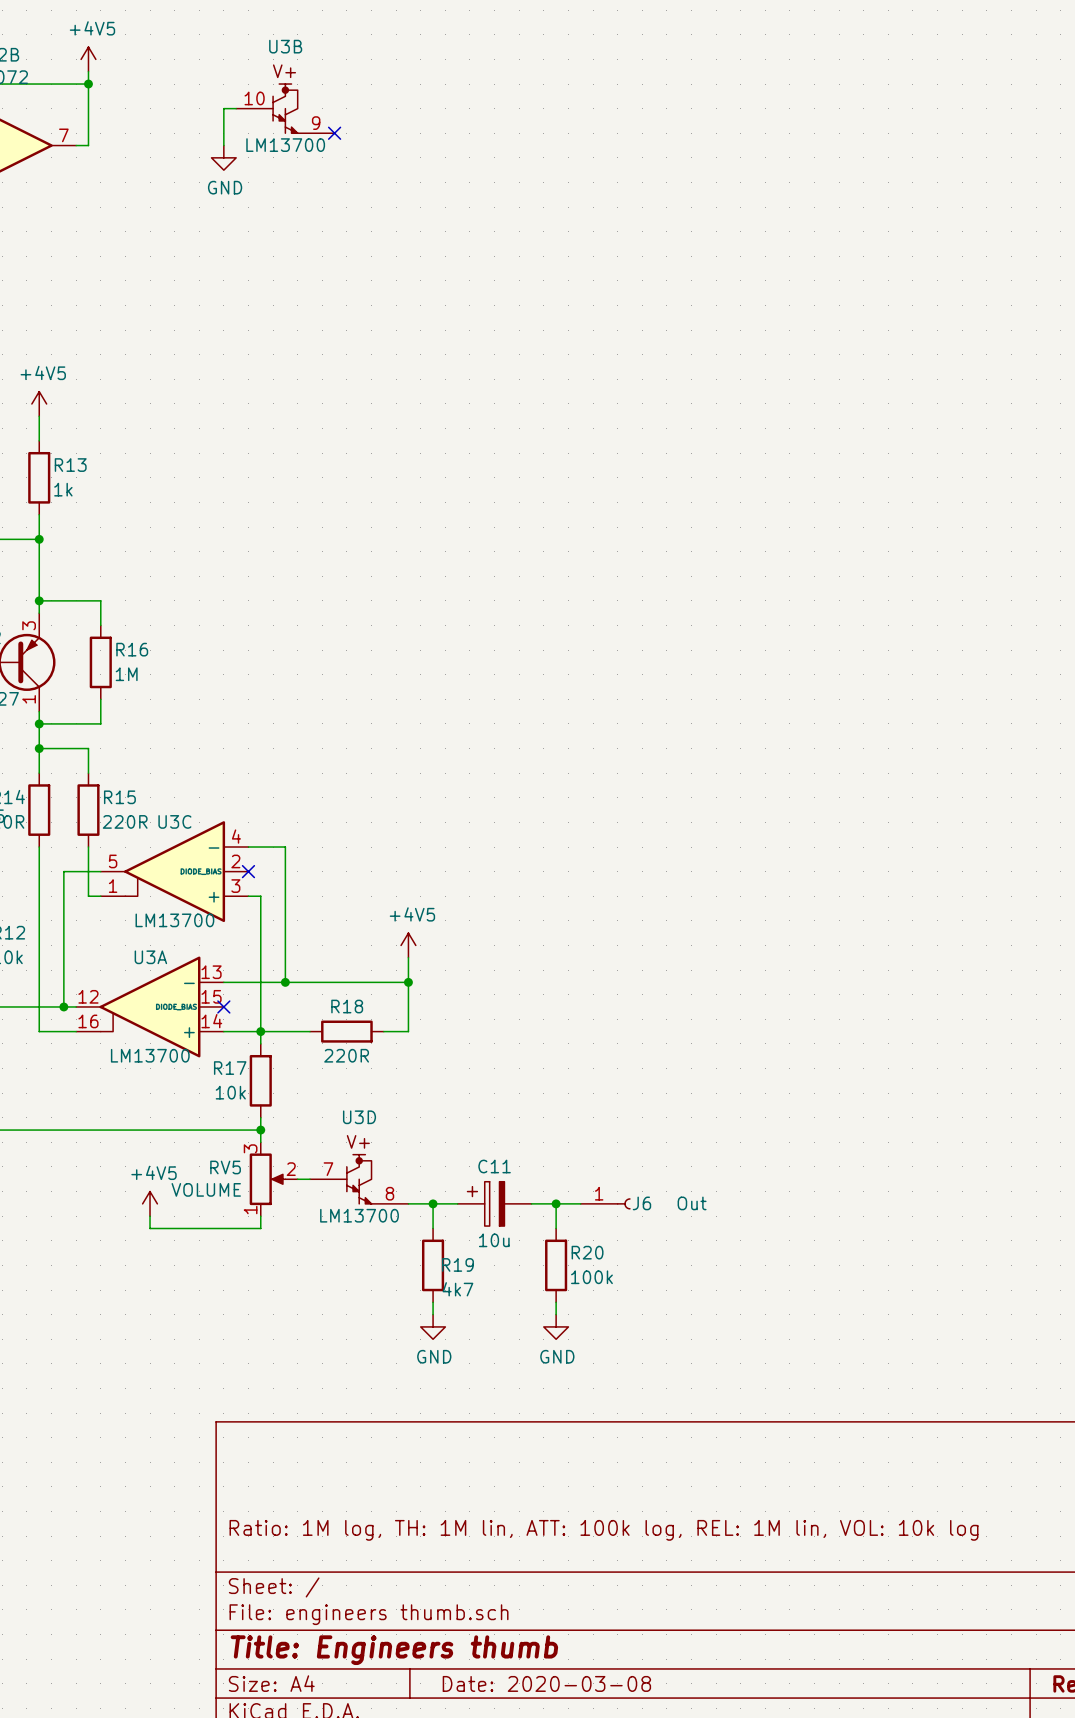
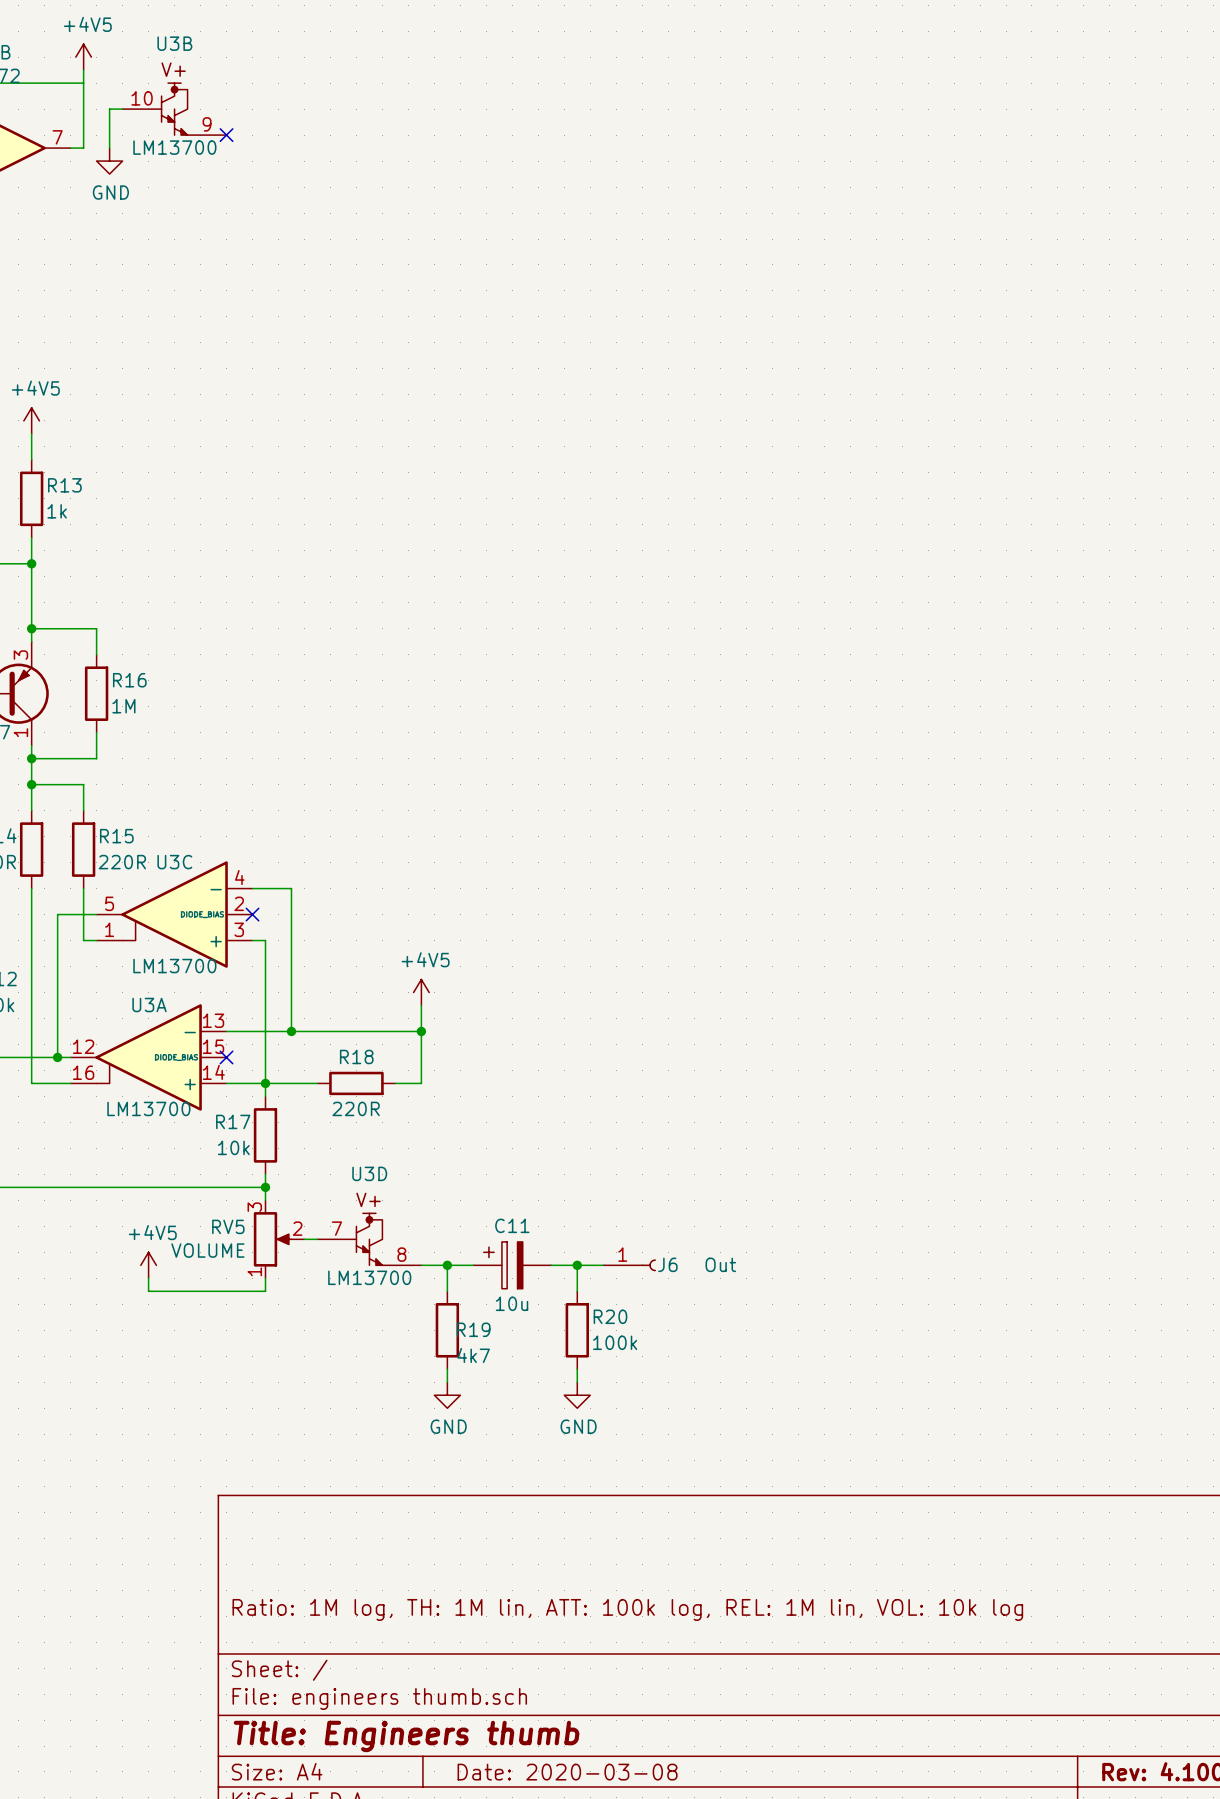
junction: (88, 84) -> none
wire: (236, 108) (223, 108) (223, 145) -> (122, 109) (109, 109) (109, 148)
U3B position: (285, 108) -> (174, 109)
no-connect mark: none -> (226, 135)
no-connect mark: (334, 133) -> none
power symbol position: GND (223, 157) -> GND (109, 161)

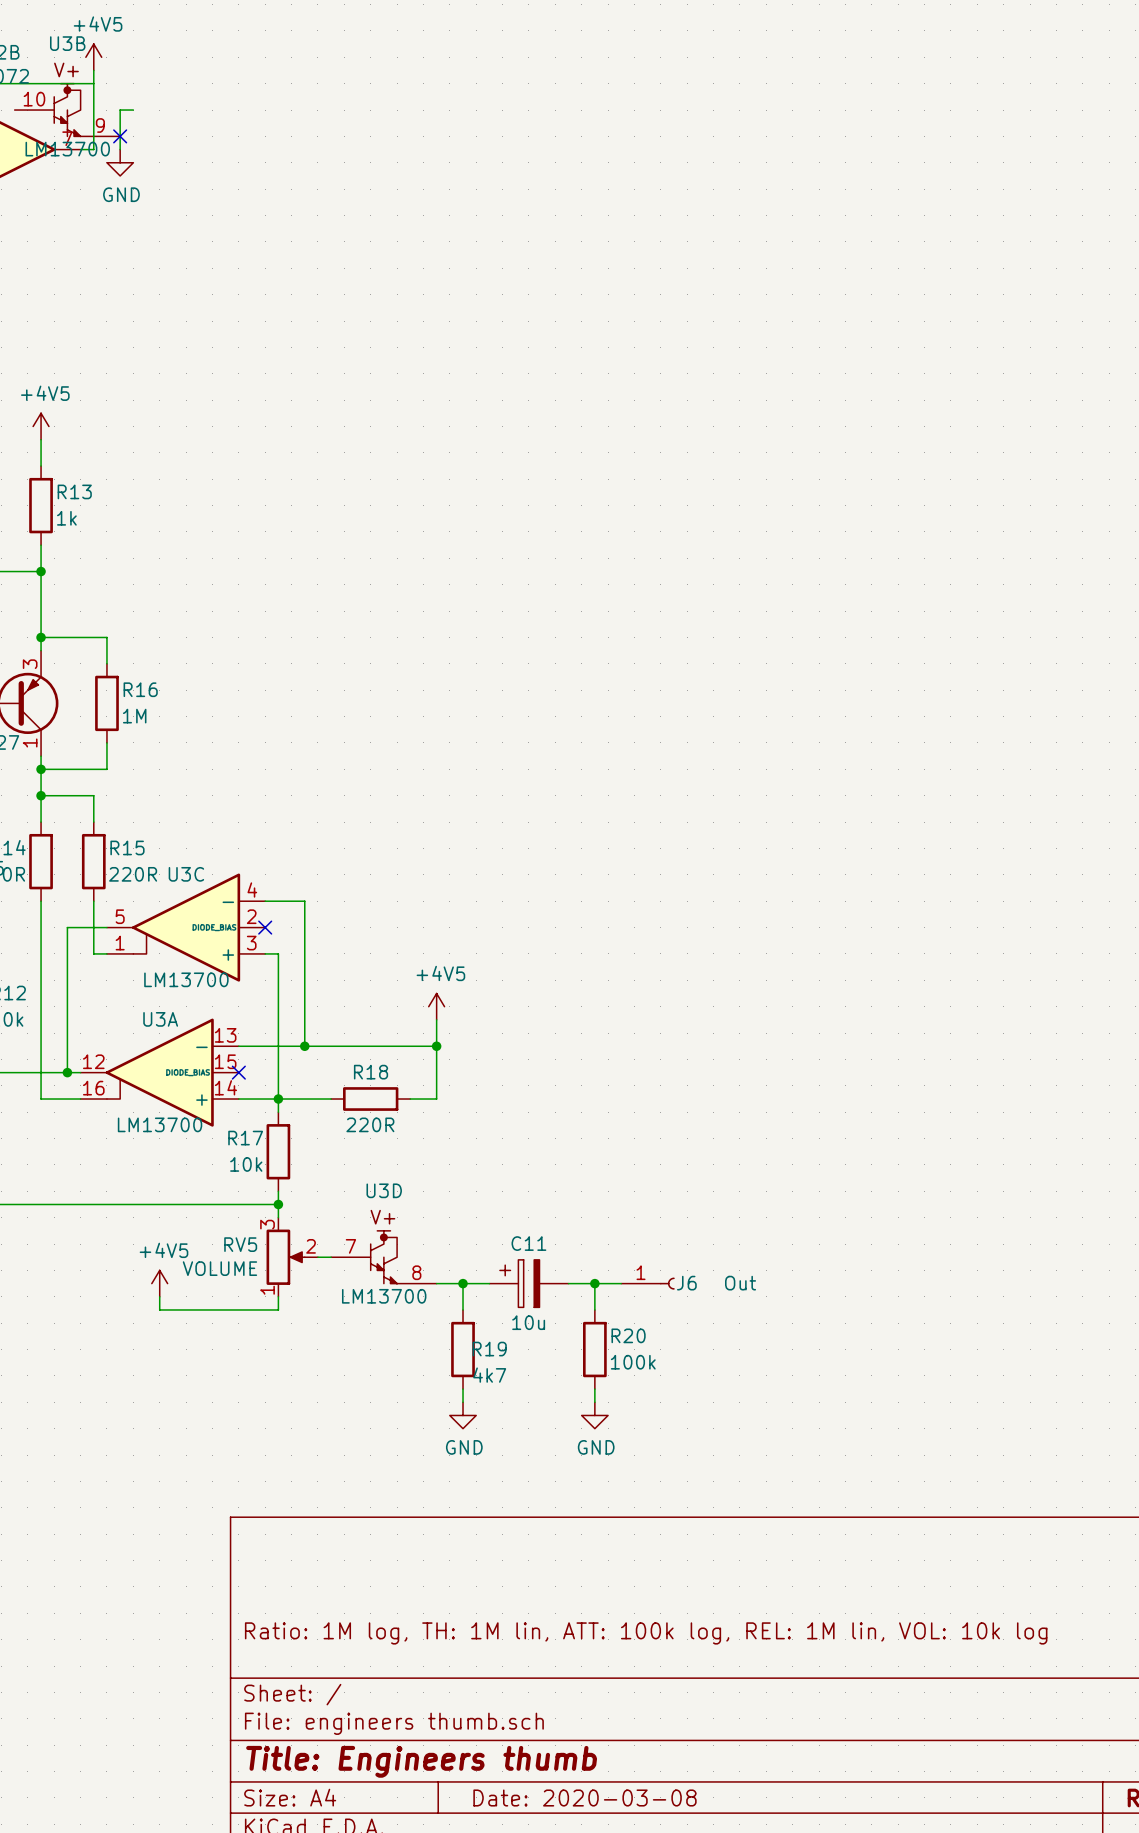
U3B position: (174, 109) -> (67, 110)
no-connect mark: none -> (120, 136)
no-connect mark: (226, 135) -> none

